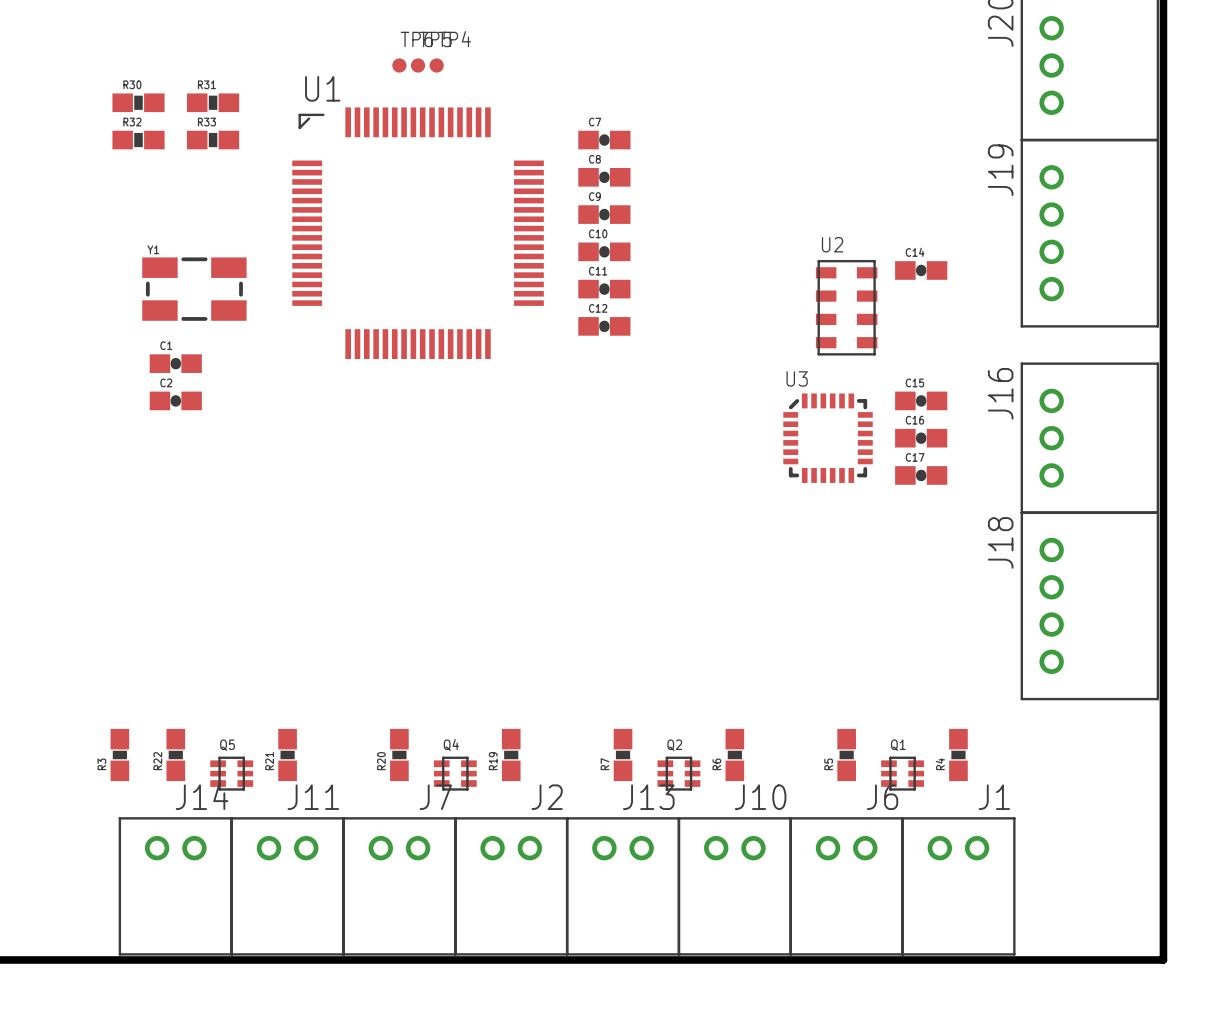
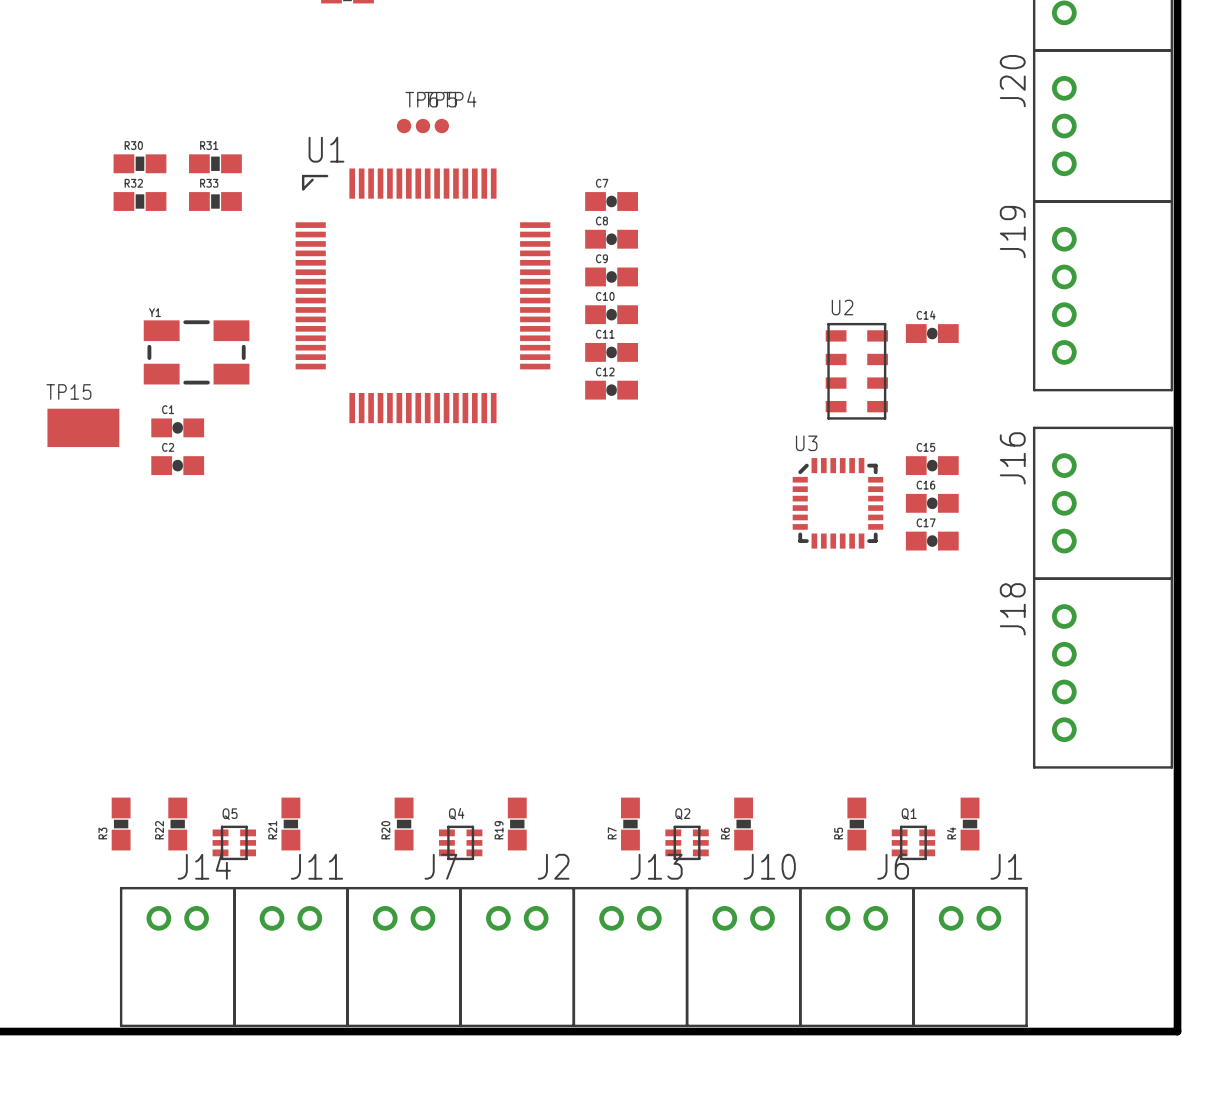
TP15: none -> (83, 427)

